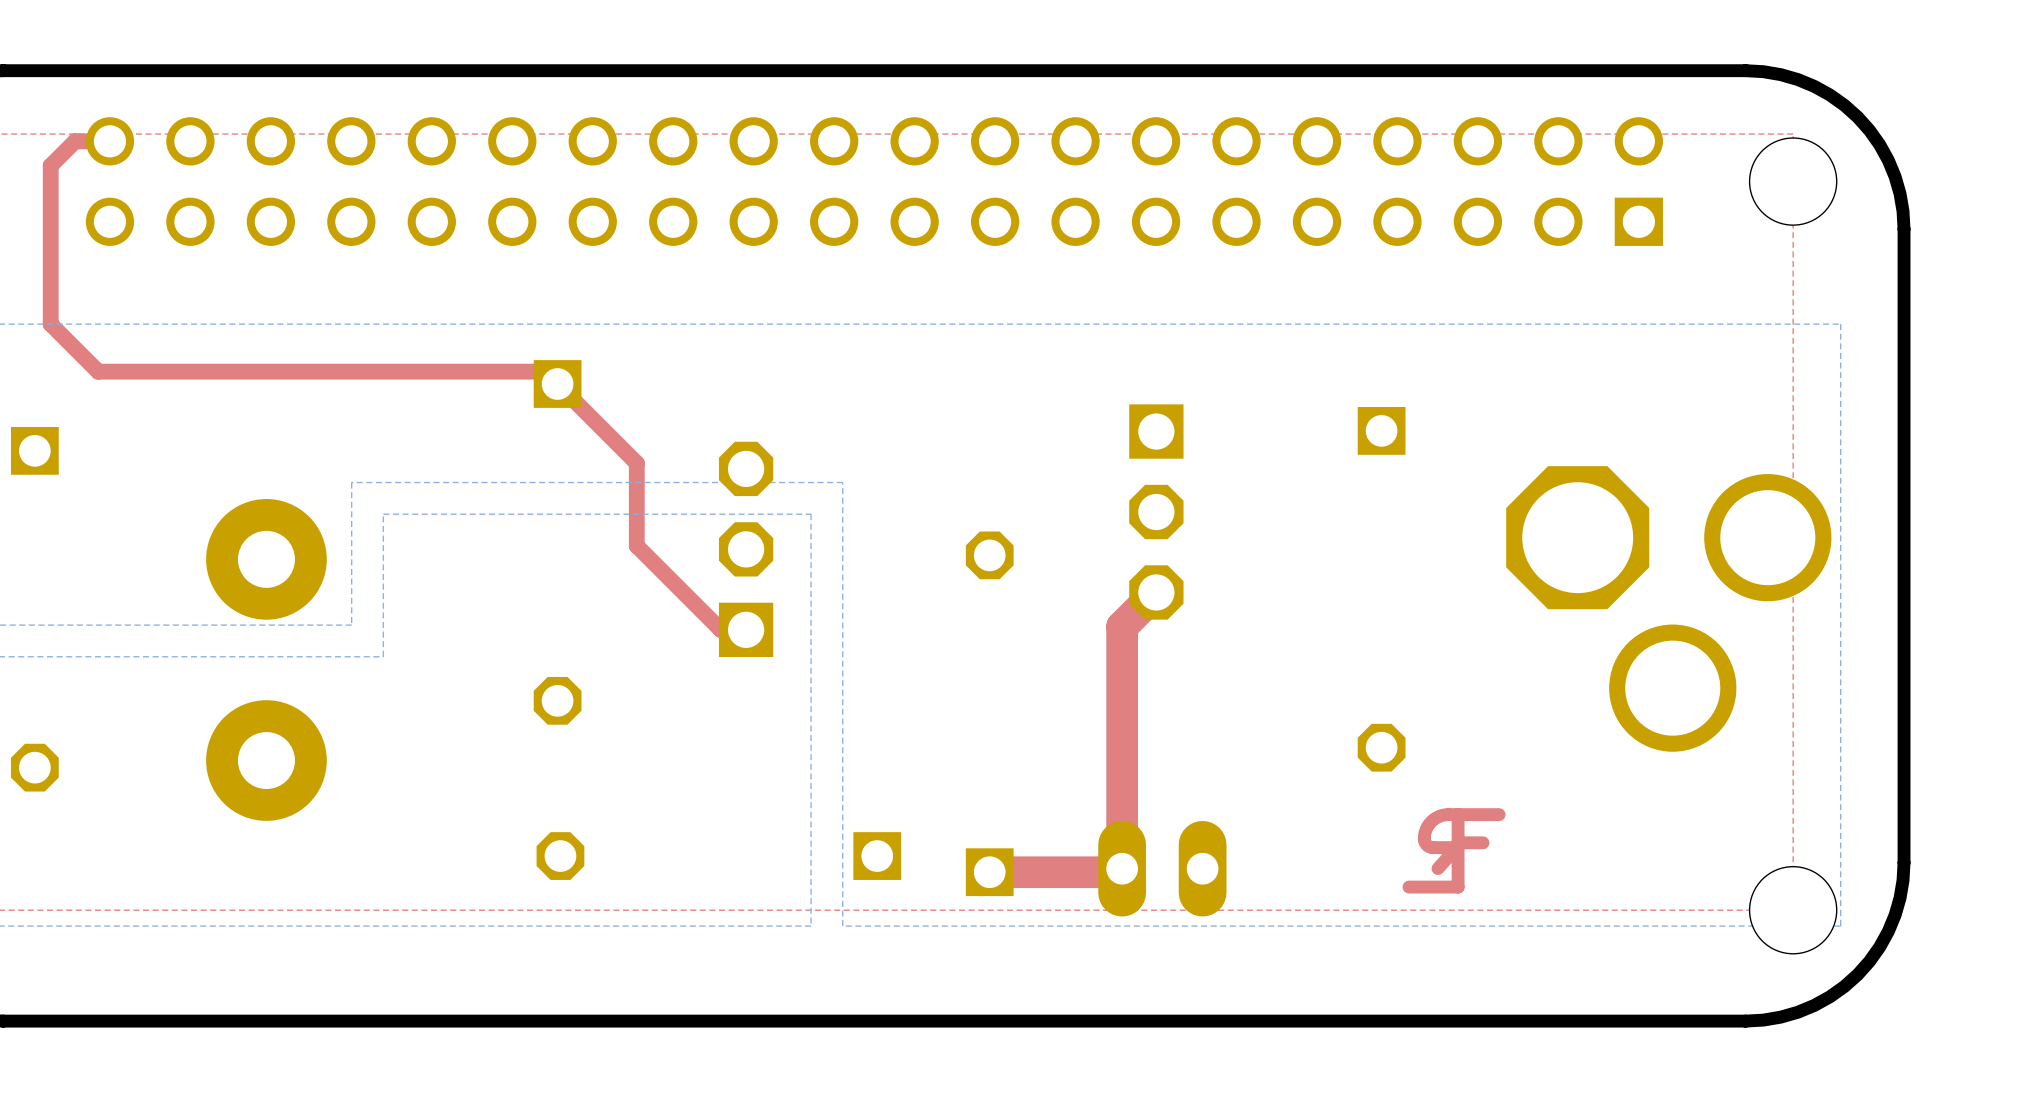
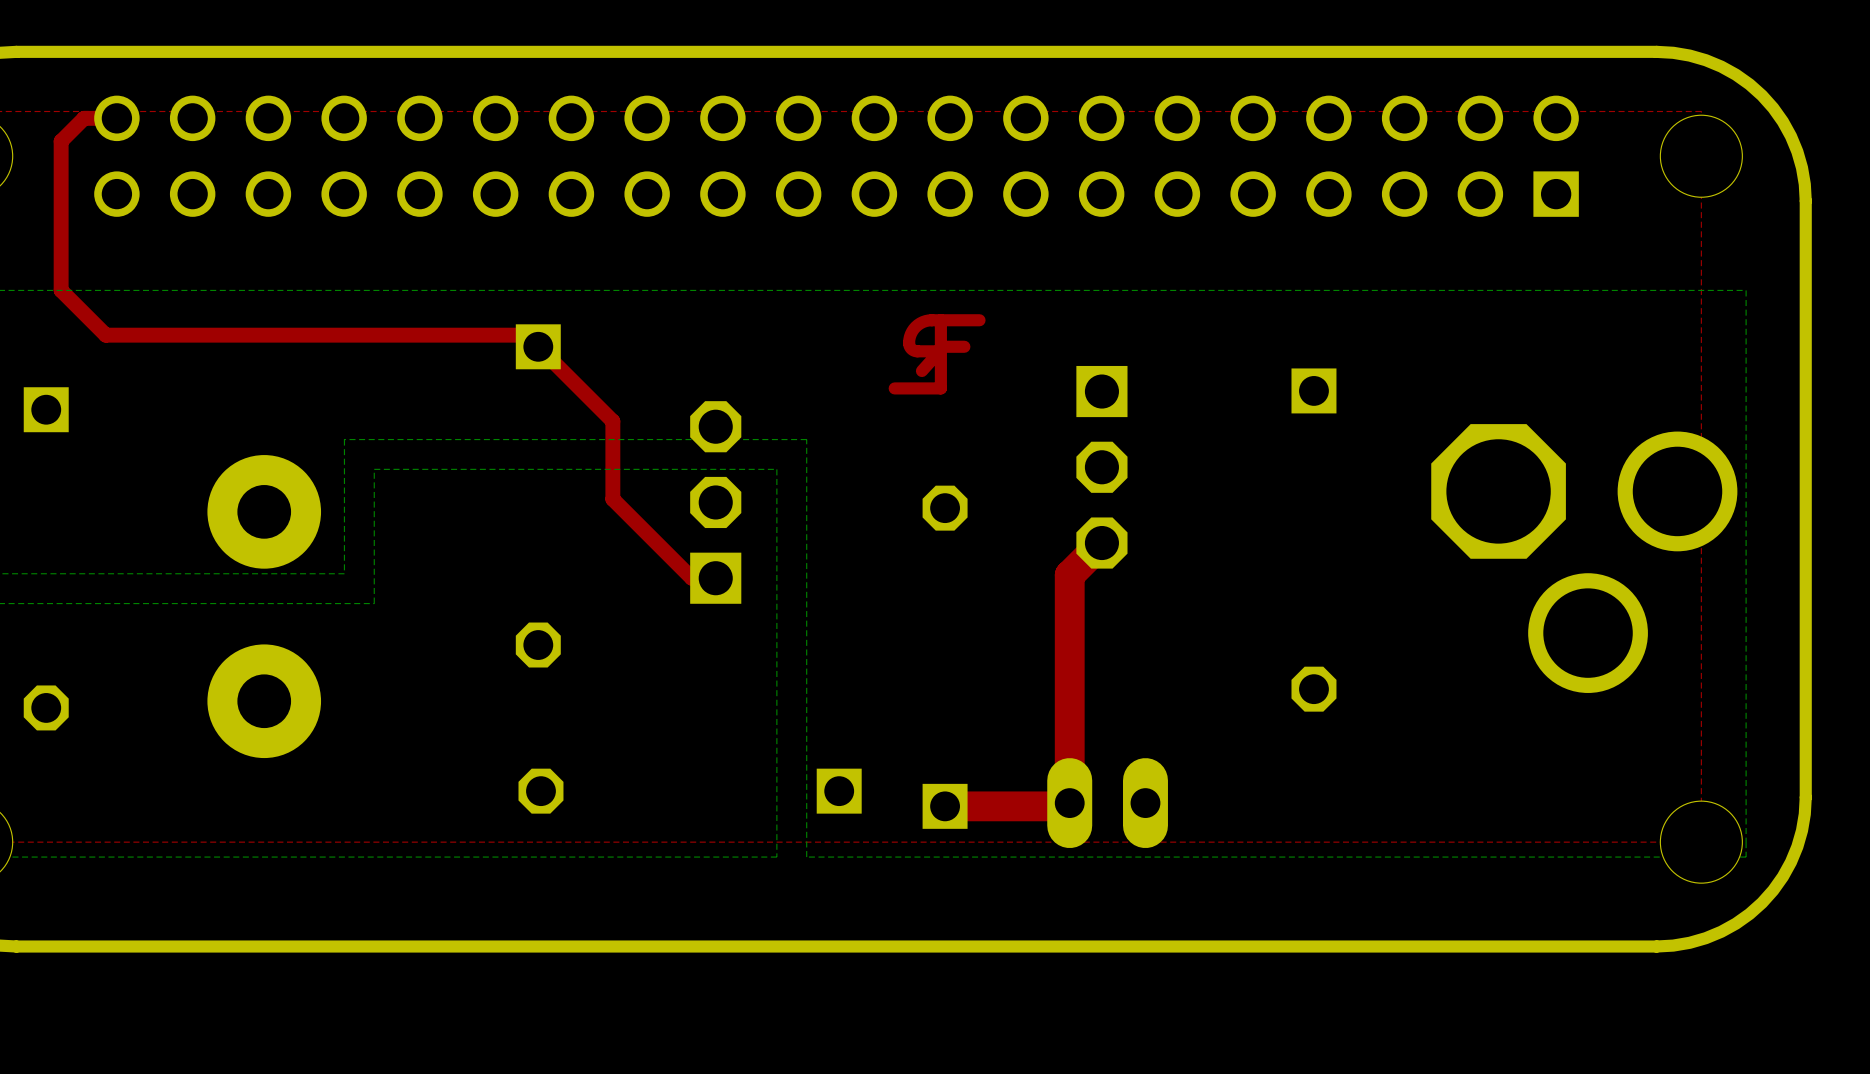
drawing position: (1454, 850) -> (937, 354)

